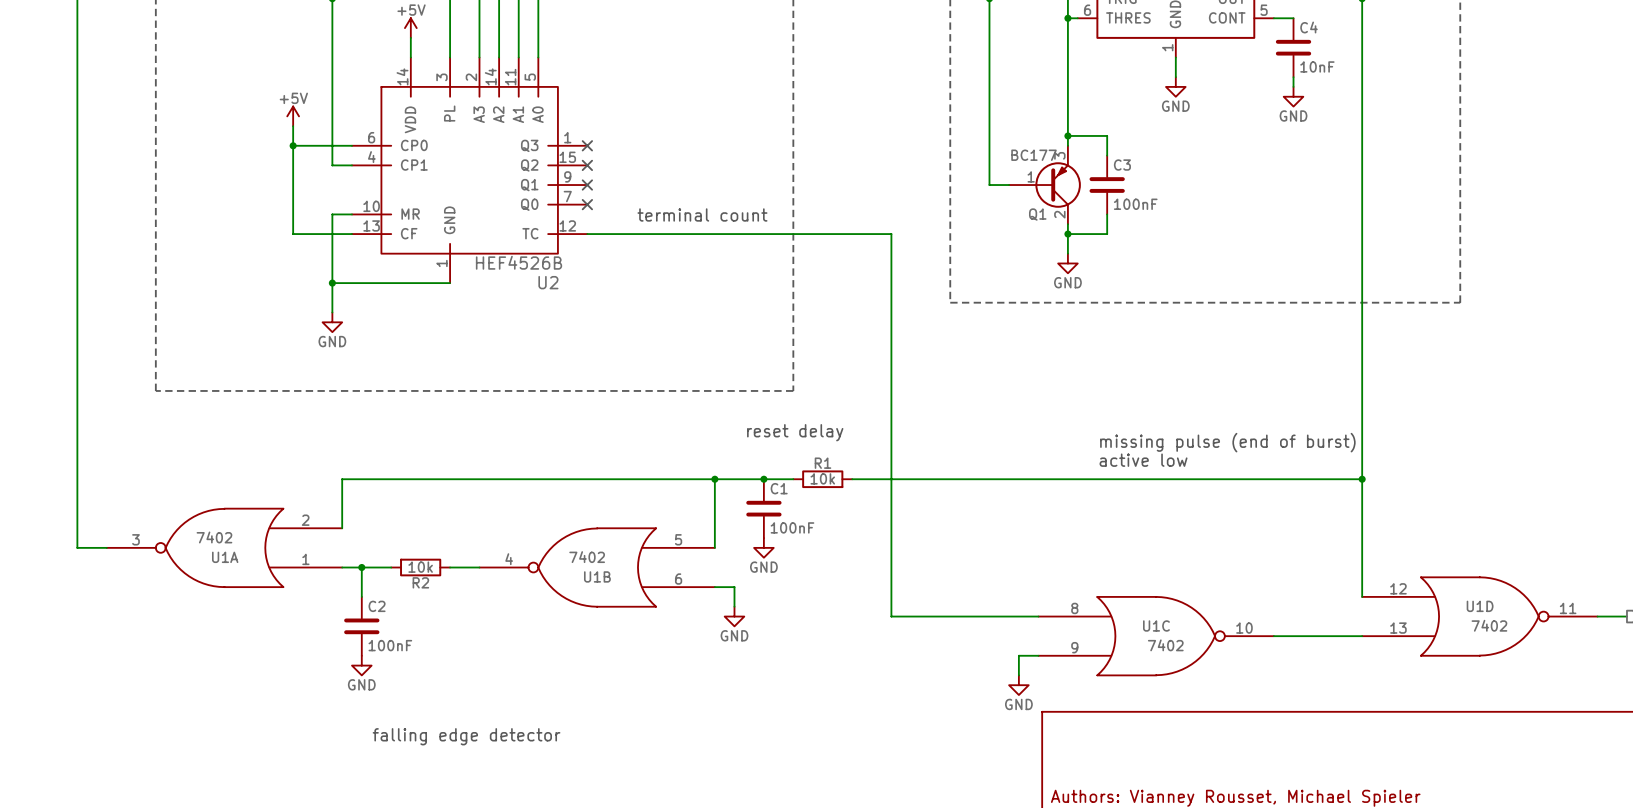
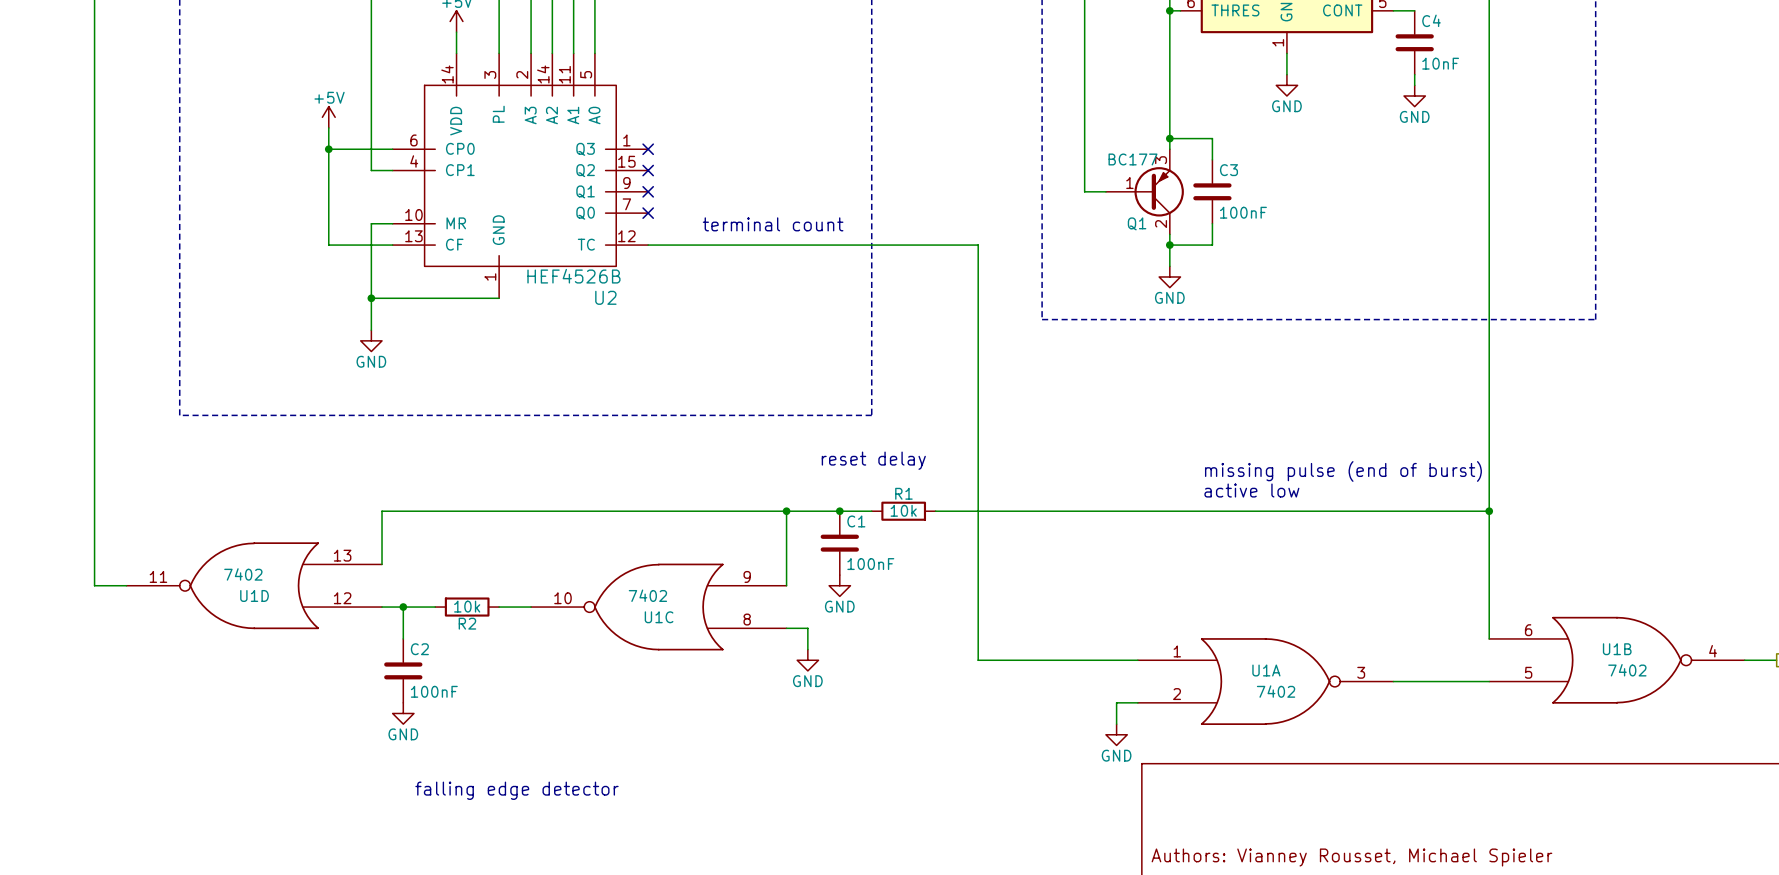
U1A rotation: 0° (224, 547) -> 180° (1265, 681)
U1A position: (224, 547) -> (1265, 681)
U1B rotation: 0° (597, 567) -> 180° (1617, 660)
U1B position: (597, 567) -> (1616, 660)
U1D rotation: 0° (1479, 616) -> 180° (254, 585)
U1D position: (1479, 616) -> (254, 585)
U1C rotation: 0° (1156, 636) -> 180° (658, 607)
U1C position: (1156, 636) -> (658, 607)

